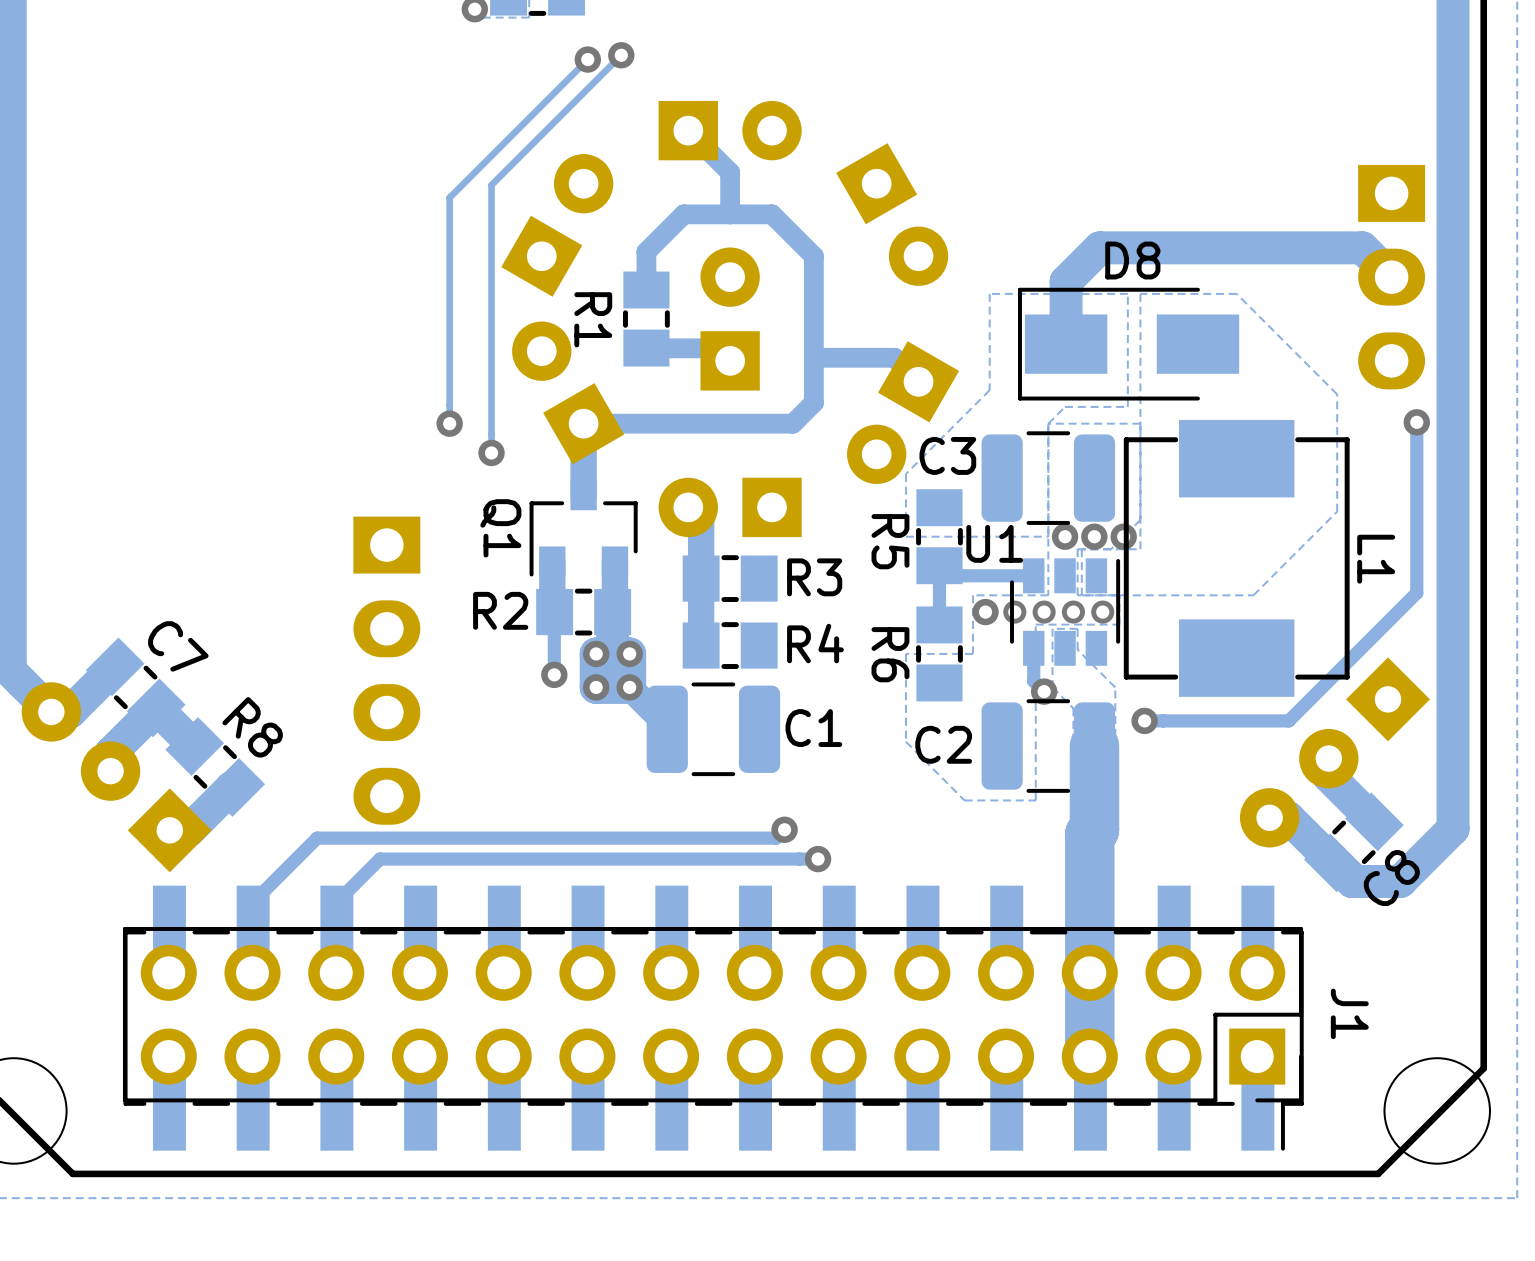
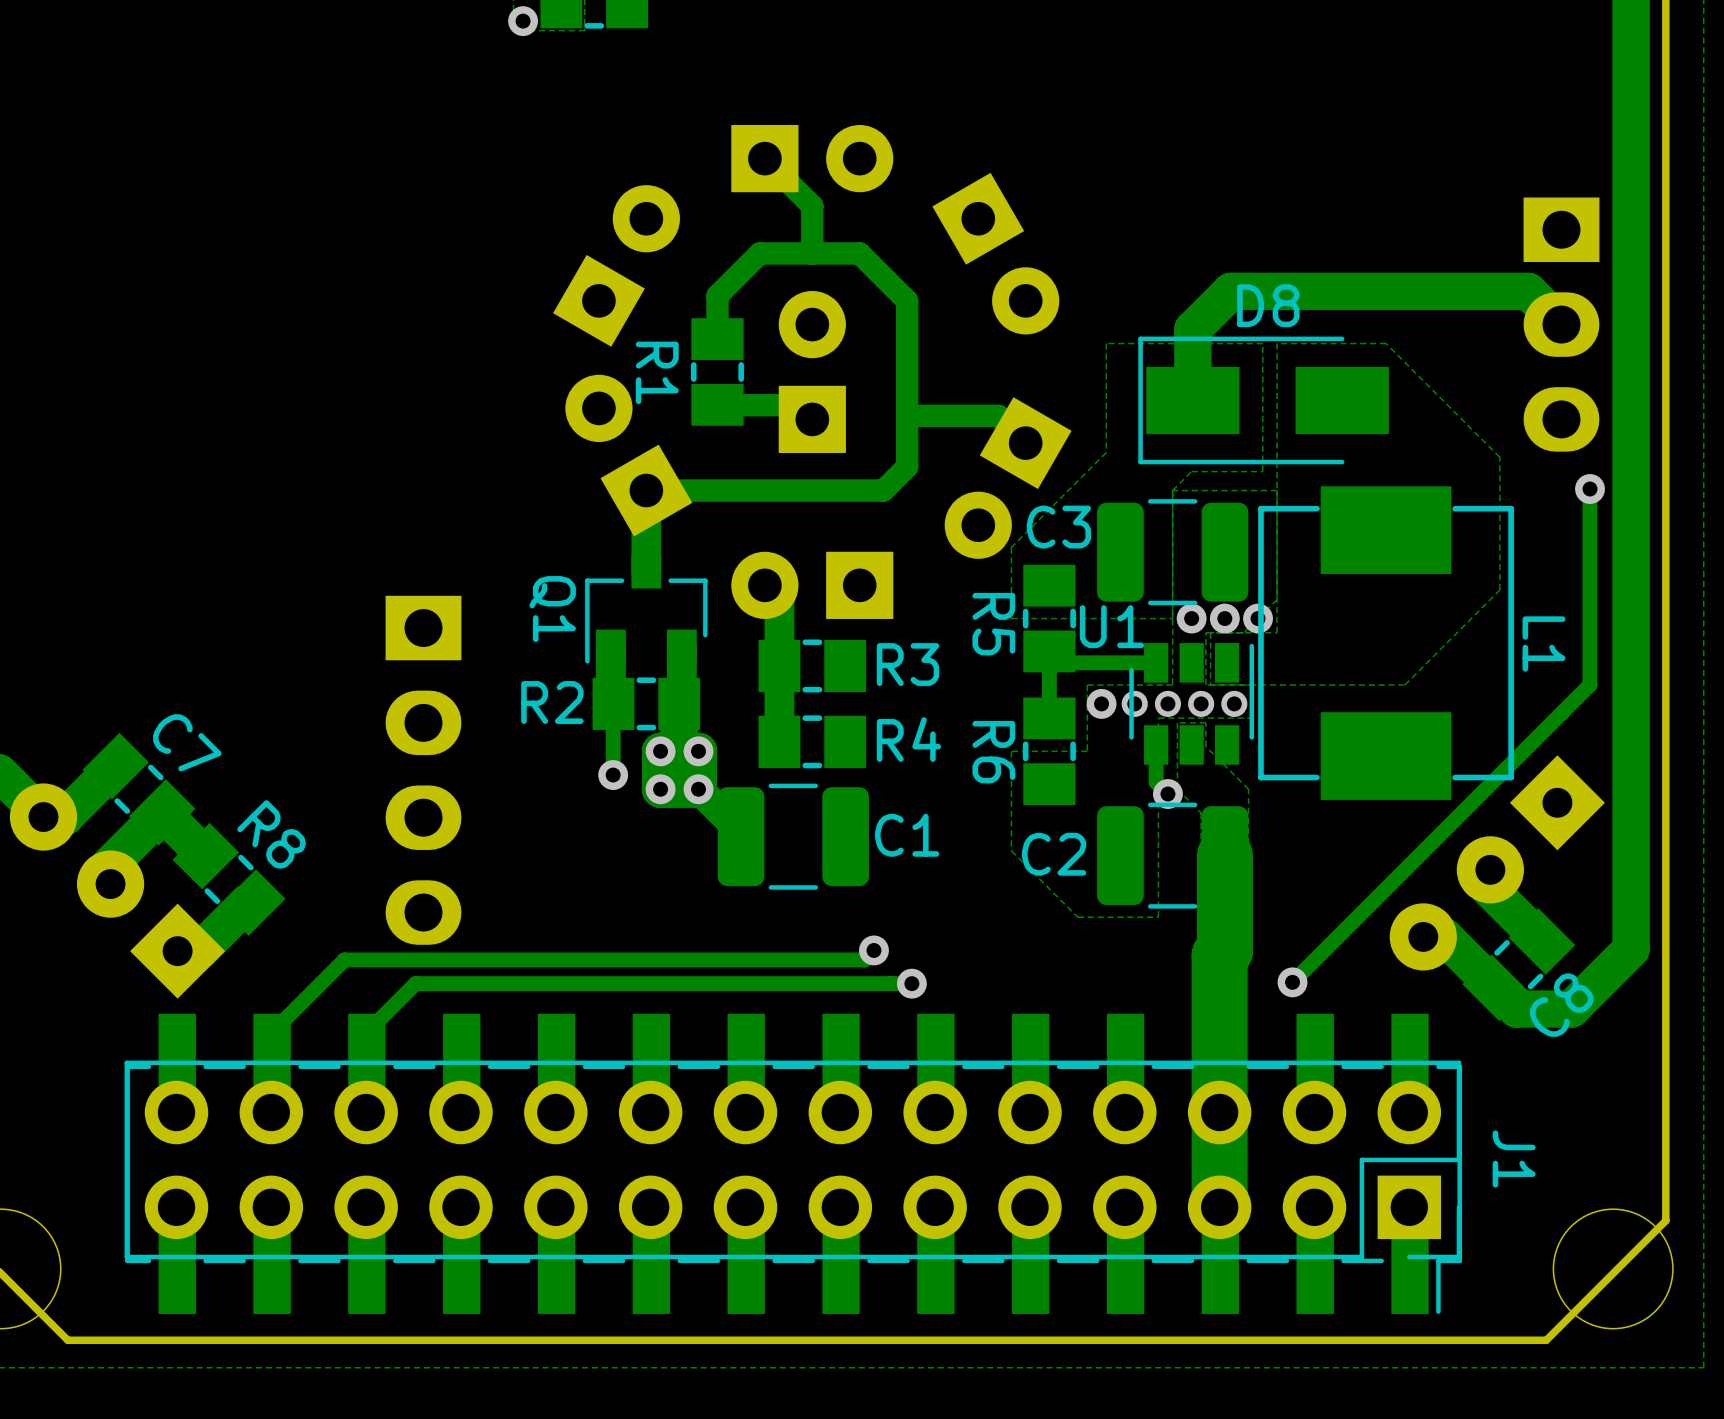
track: (621, 55) (491, 185) (491, 452) -> none
via: (621, 55) -> none
track: (587, 59) (449, 197) (449, 423) -> none
via: (587, 59) -> none
via: (449, 423) -> none
via: (491, 452) -> none
track: (1416, 592) (1288, 720) (1144, 720) -> (1590, 682) (1590, 684) (1292, 982)
via position: (1144, 720) -> (1292, 982)

